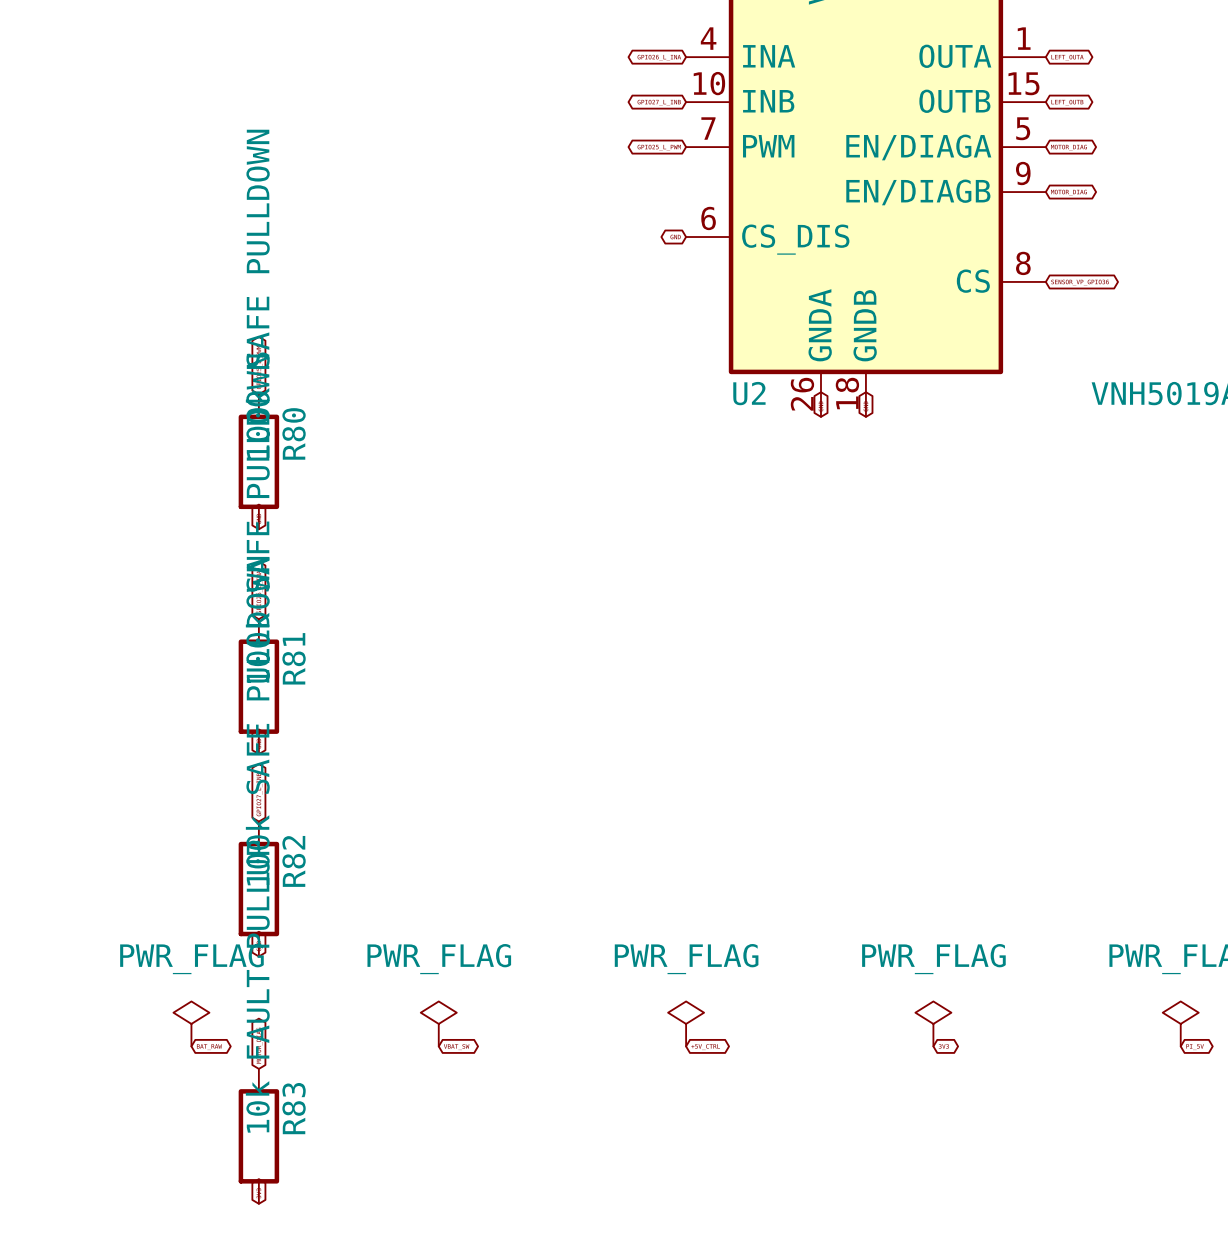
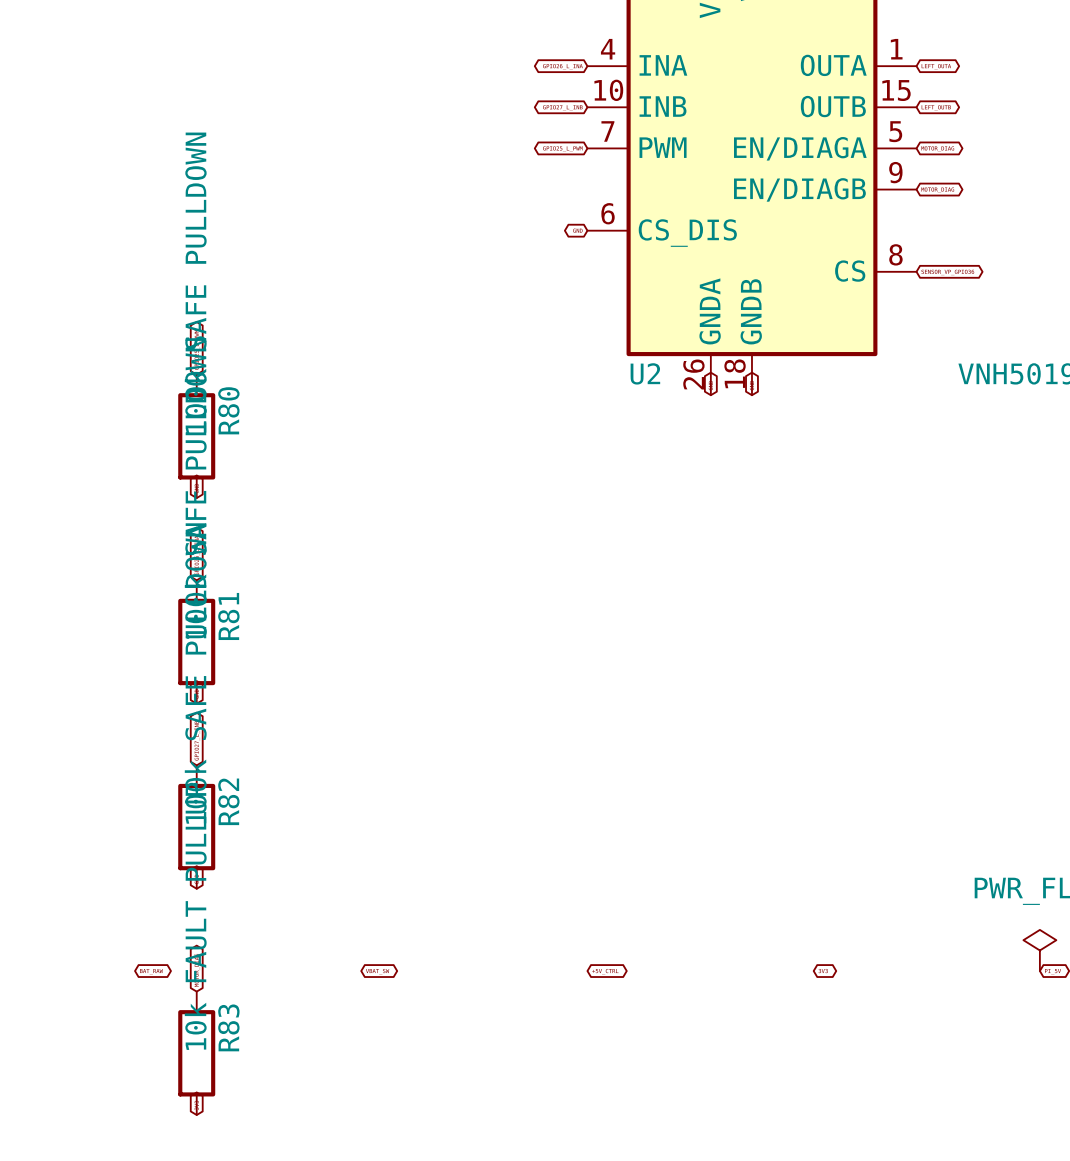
power symbol: PWR_FLAG (191, 1023) -> none
power symbol: PWR_FLAG (438, 1023) -> none
power symbol: PWR_FLAG (686, 1023) -> none
power symbol: PWR_FLAG (933, 1023) -> none

